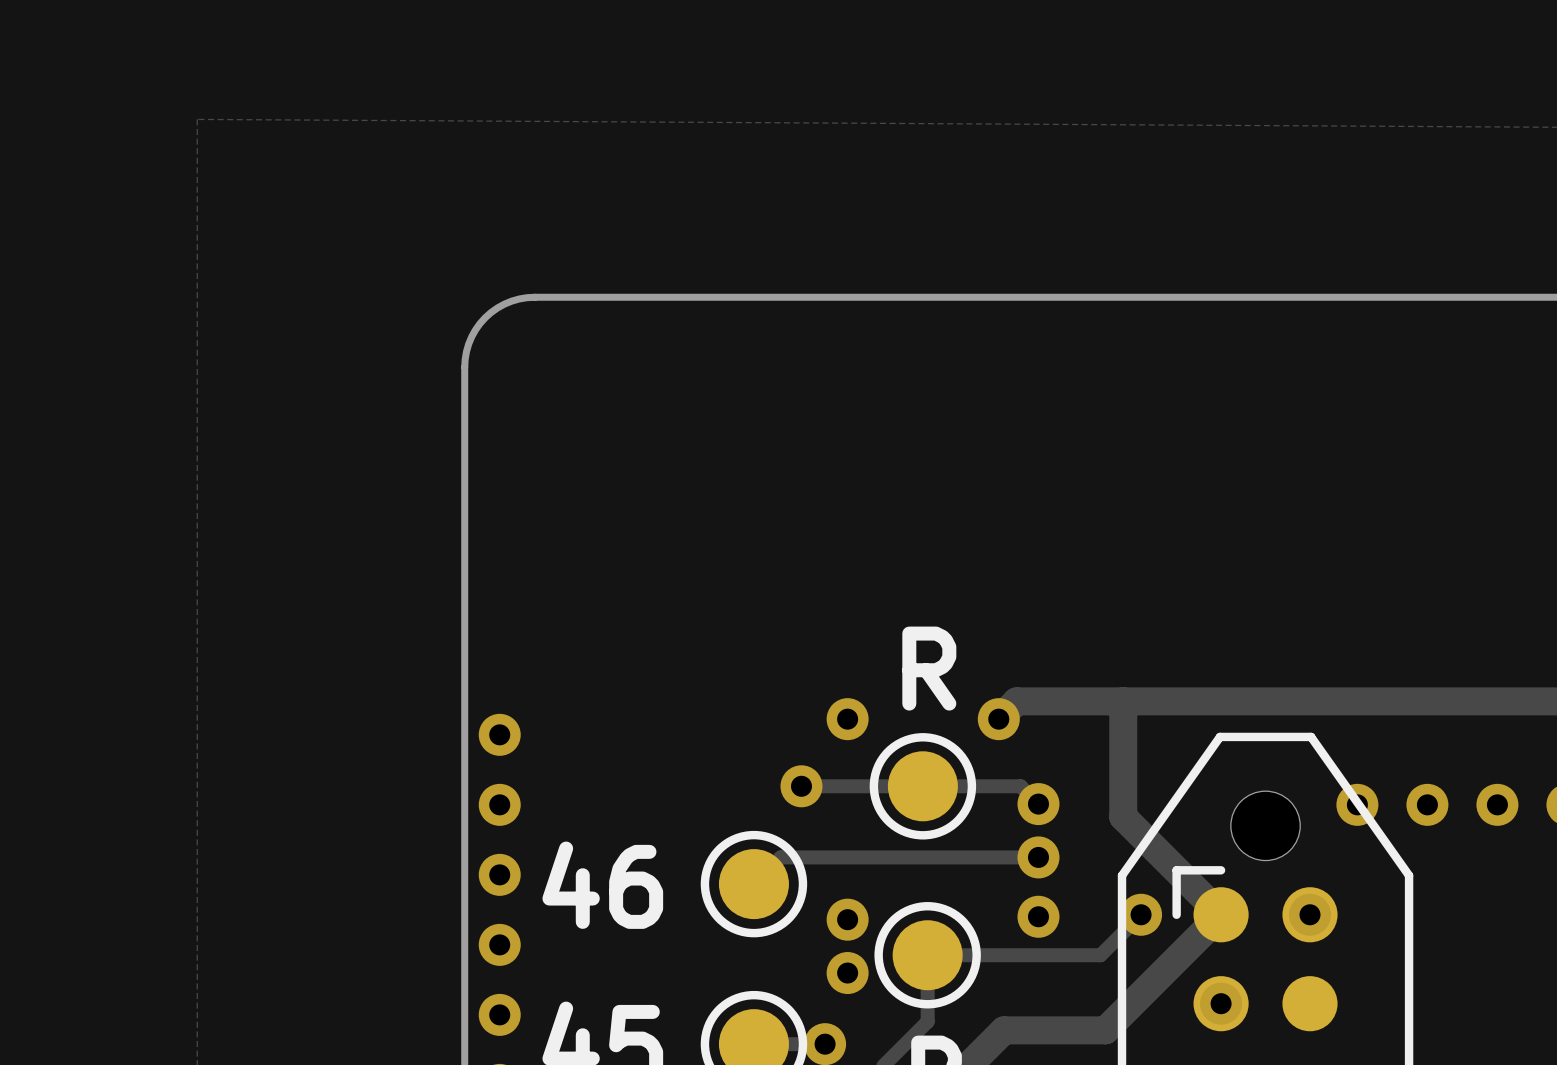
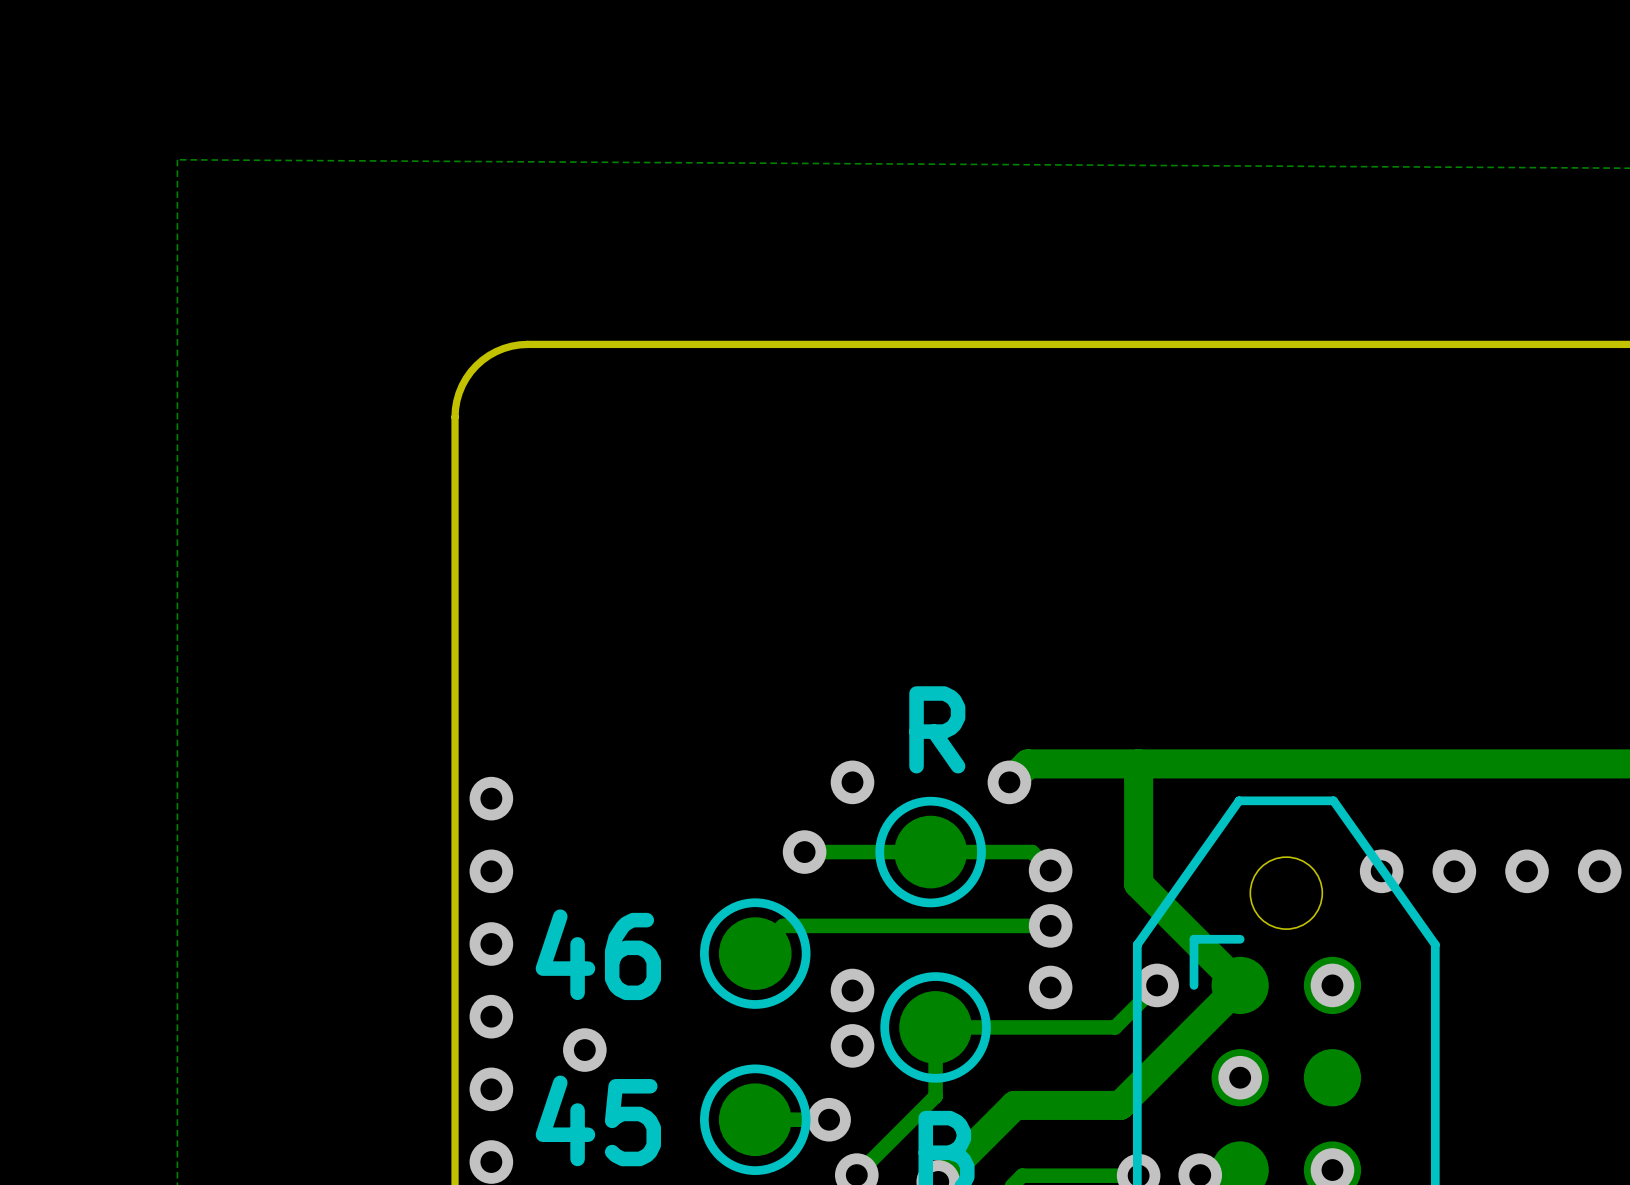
via: none -> (584, 1050)

